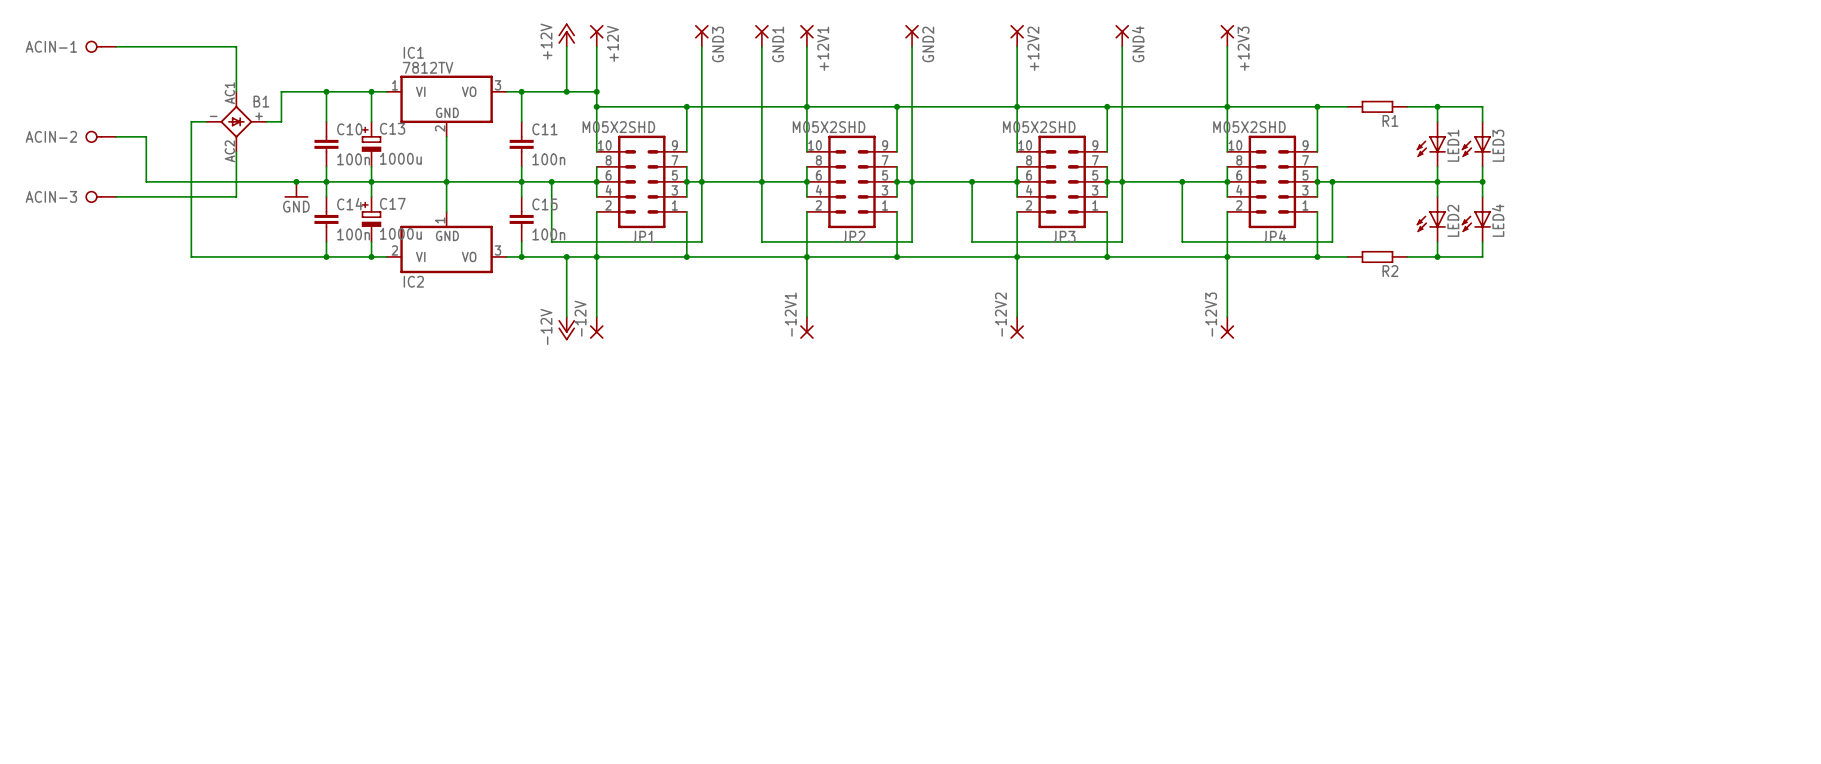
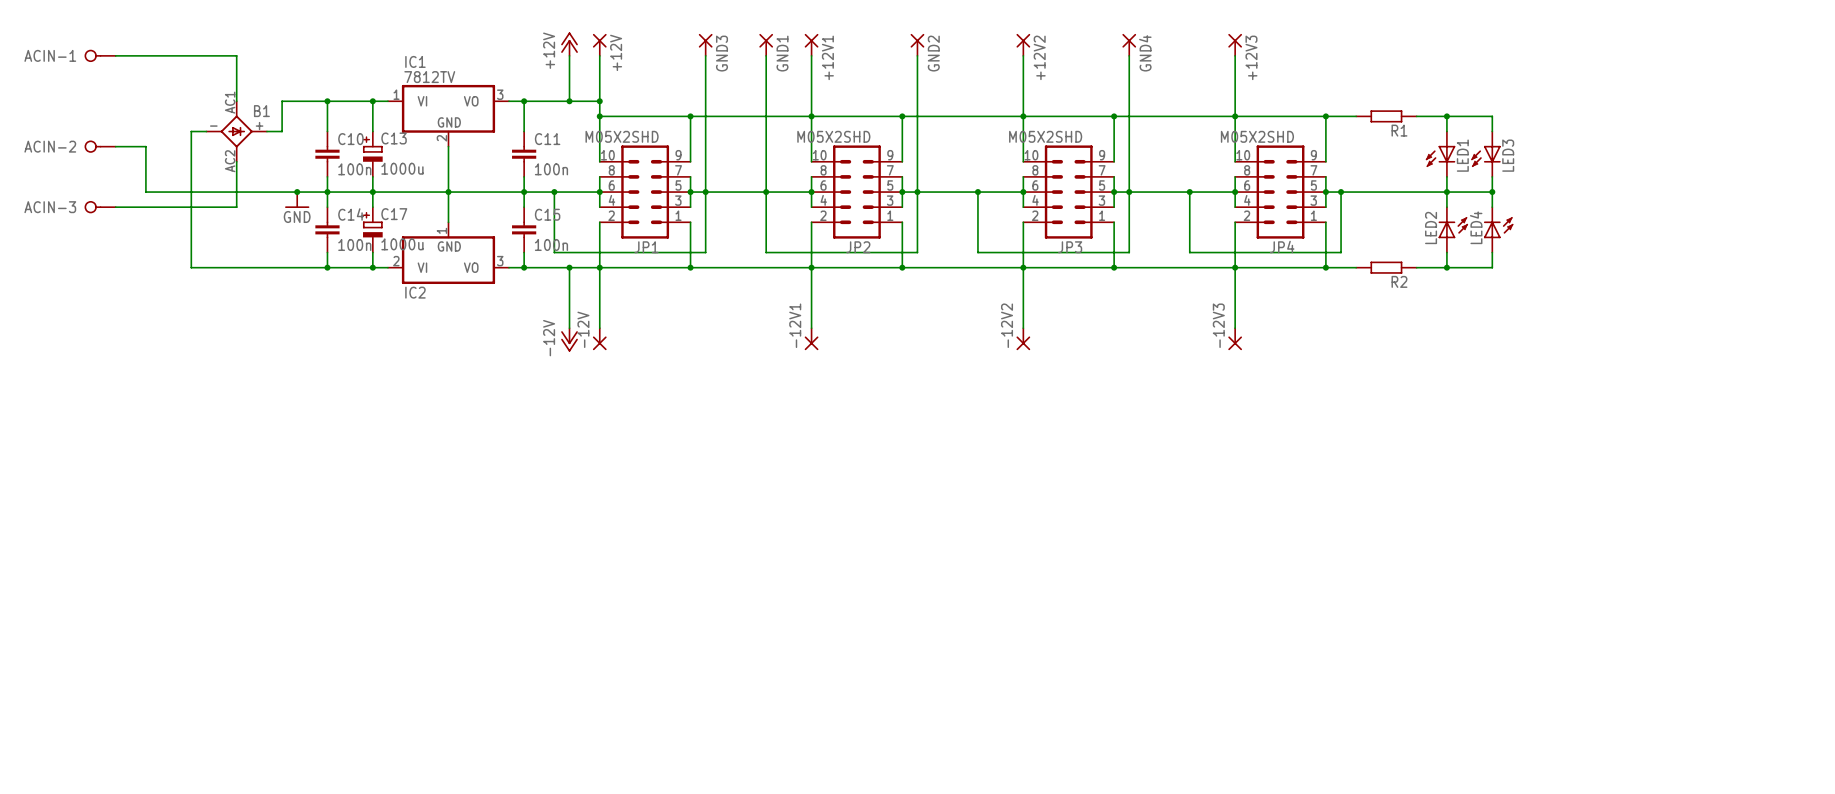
LED2 rotation: 0° (1431, 221) -> 180° (1453, 227)
LED4 rotation: 0° (1476, 221) -> 180° (1498, 227)

